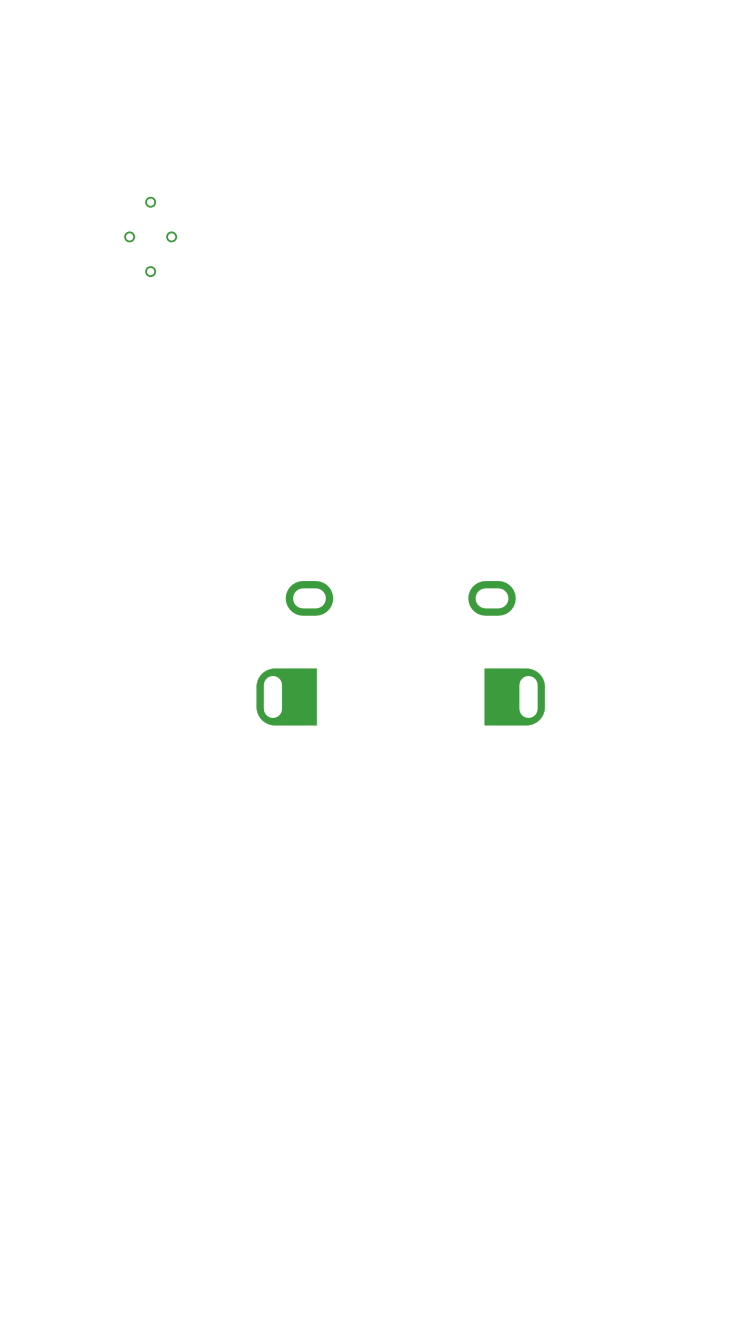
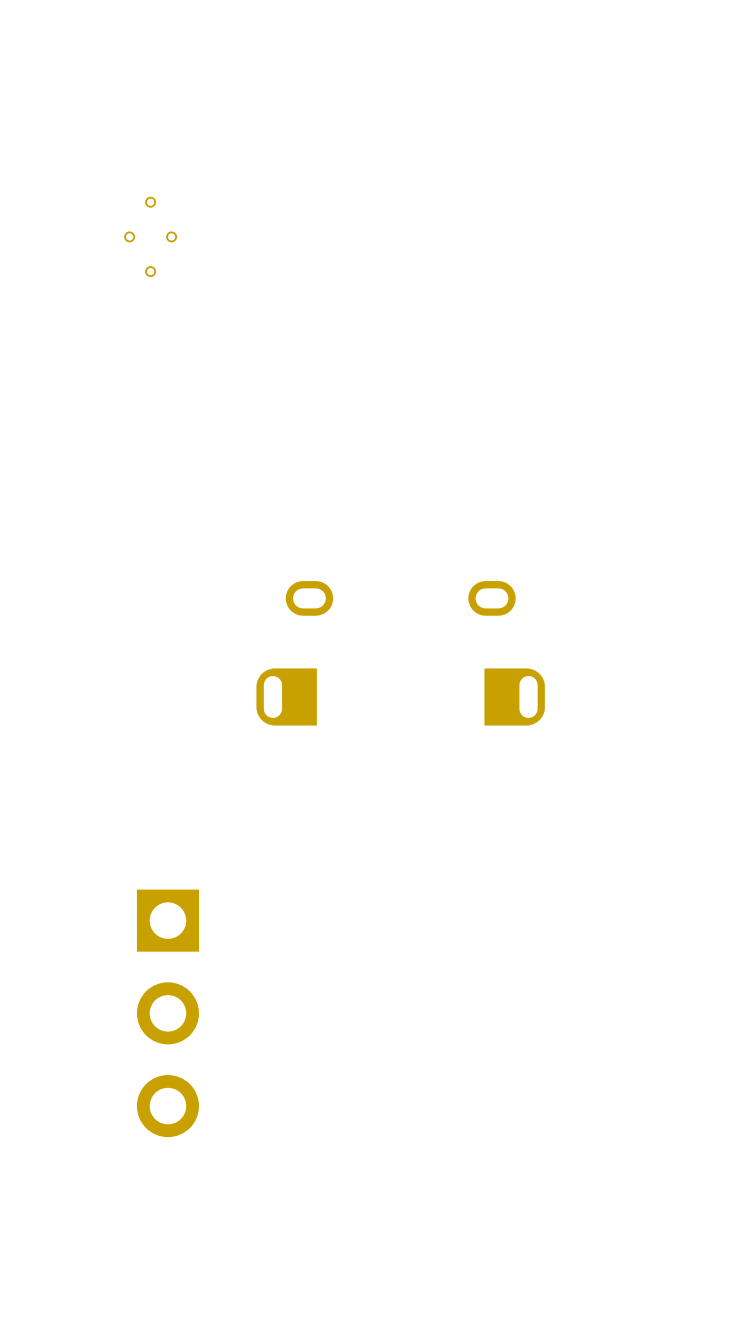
part: none -> (167, 1013)

